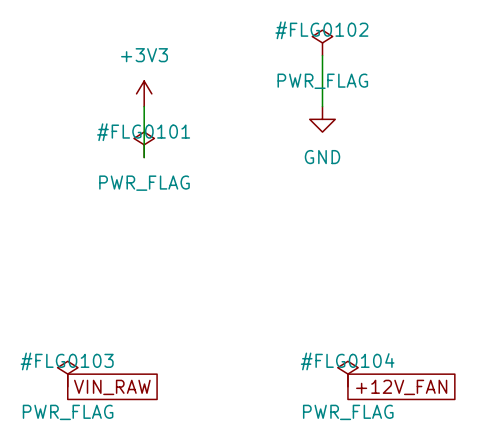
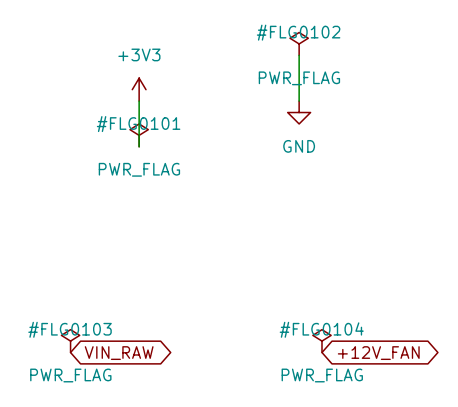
global label shape: passive (112, 387) -> bidirectional (119, 353)
global label shape: passive (401, 387) -> bidirectional (378, 353)

